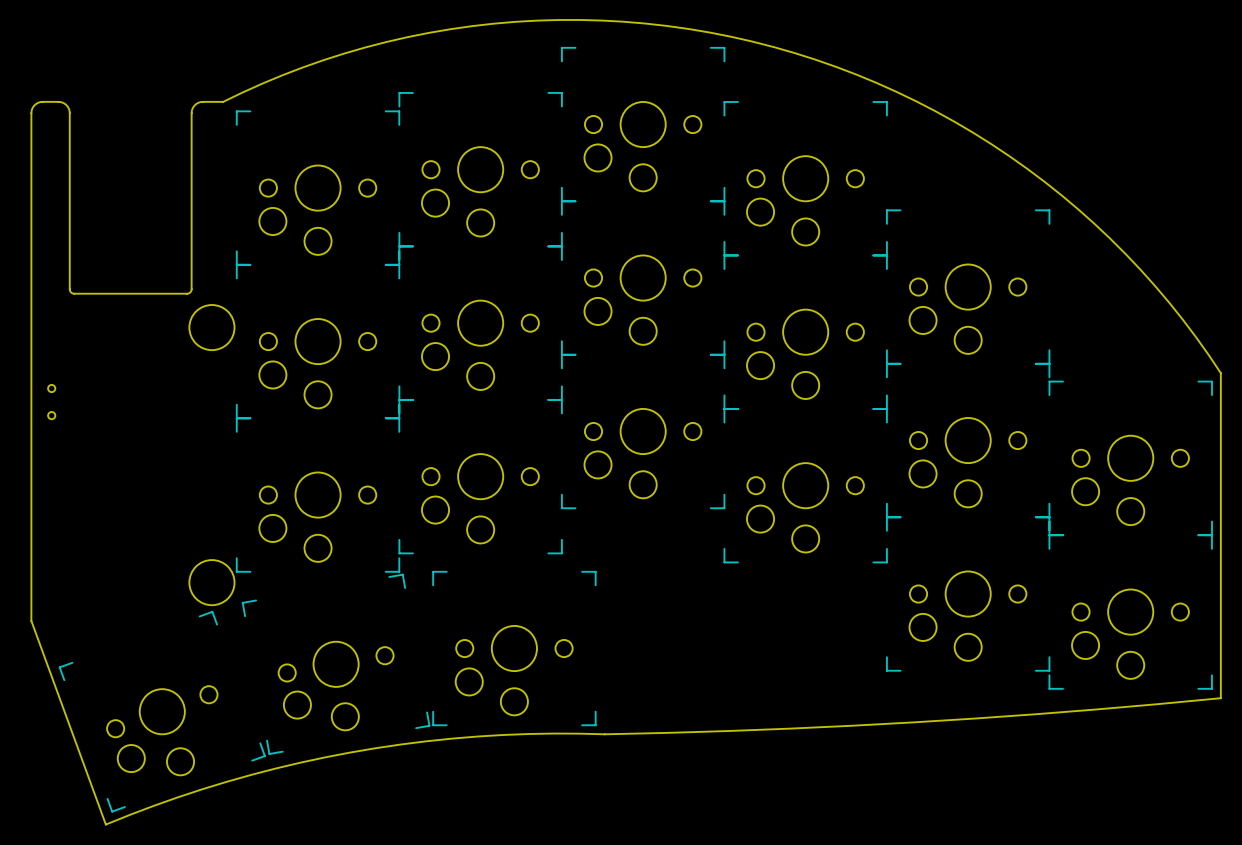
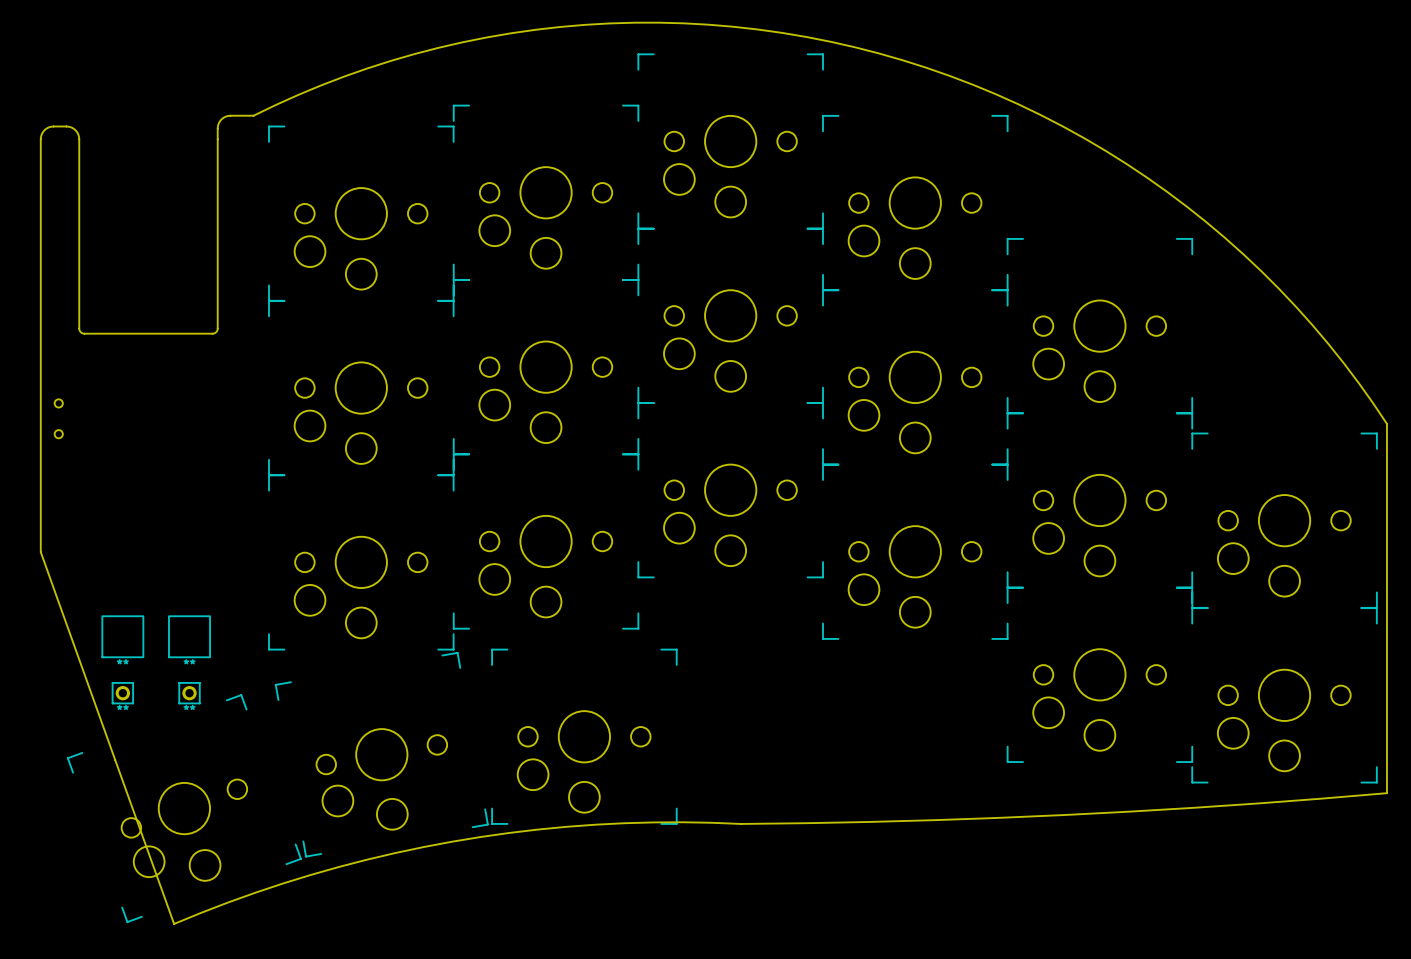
board edge: (69, 122) (68, 108) (62, 102) (39, 102) (32, 108) (31, 620) (105, 824) (177, 797) (275, 768) (350, 752) (426, 741) (528, 734) (666, 732) (851, 725) (1036, 714) (1220, 698) -> (79, 139) (75, 130) (66, 126) (48, 127) (43, 131) (40, 137) (40, 552) (174, 923) (255, 892) (366, 859) (451, 841) (537, 829) (653, 822) (805, 823) (999, 817) (1193, 807) (1386, 793)
round board edge: [188, 304, 235, 351] -> none
part position: (51, 402) -> (58, 418)
round board edge: [188, 559, 235, 606] -> none
part: none -> (122, 636)
part: none -> (189, 636)
part: none -> (122, 693)
part: none -> (189, 693)

